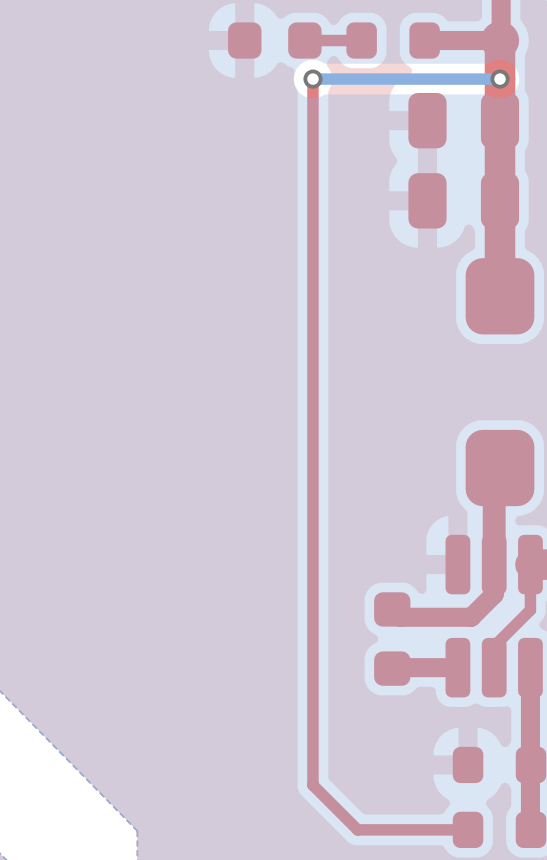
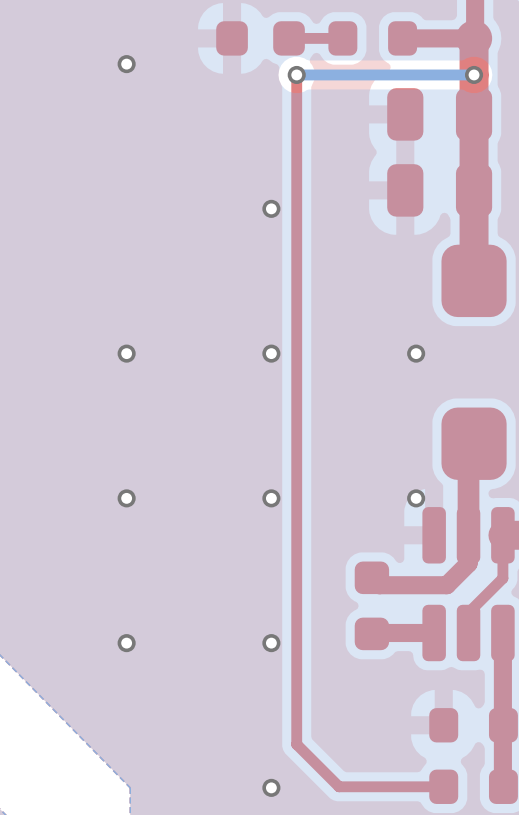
via: none -> (126, 64)
via: none -> (271, 208)
via: none -> (126, 353)
via: none -> (271, 353)
via: none -> (416, 353)
via: none -> (126, 498)
via: none -> (271, 498)
via: none -> (416, 498)
via: none -> (126, 643)
via: none -> (271, 643)
via: none -> (271, 787)

